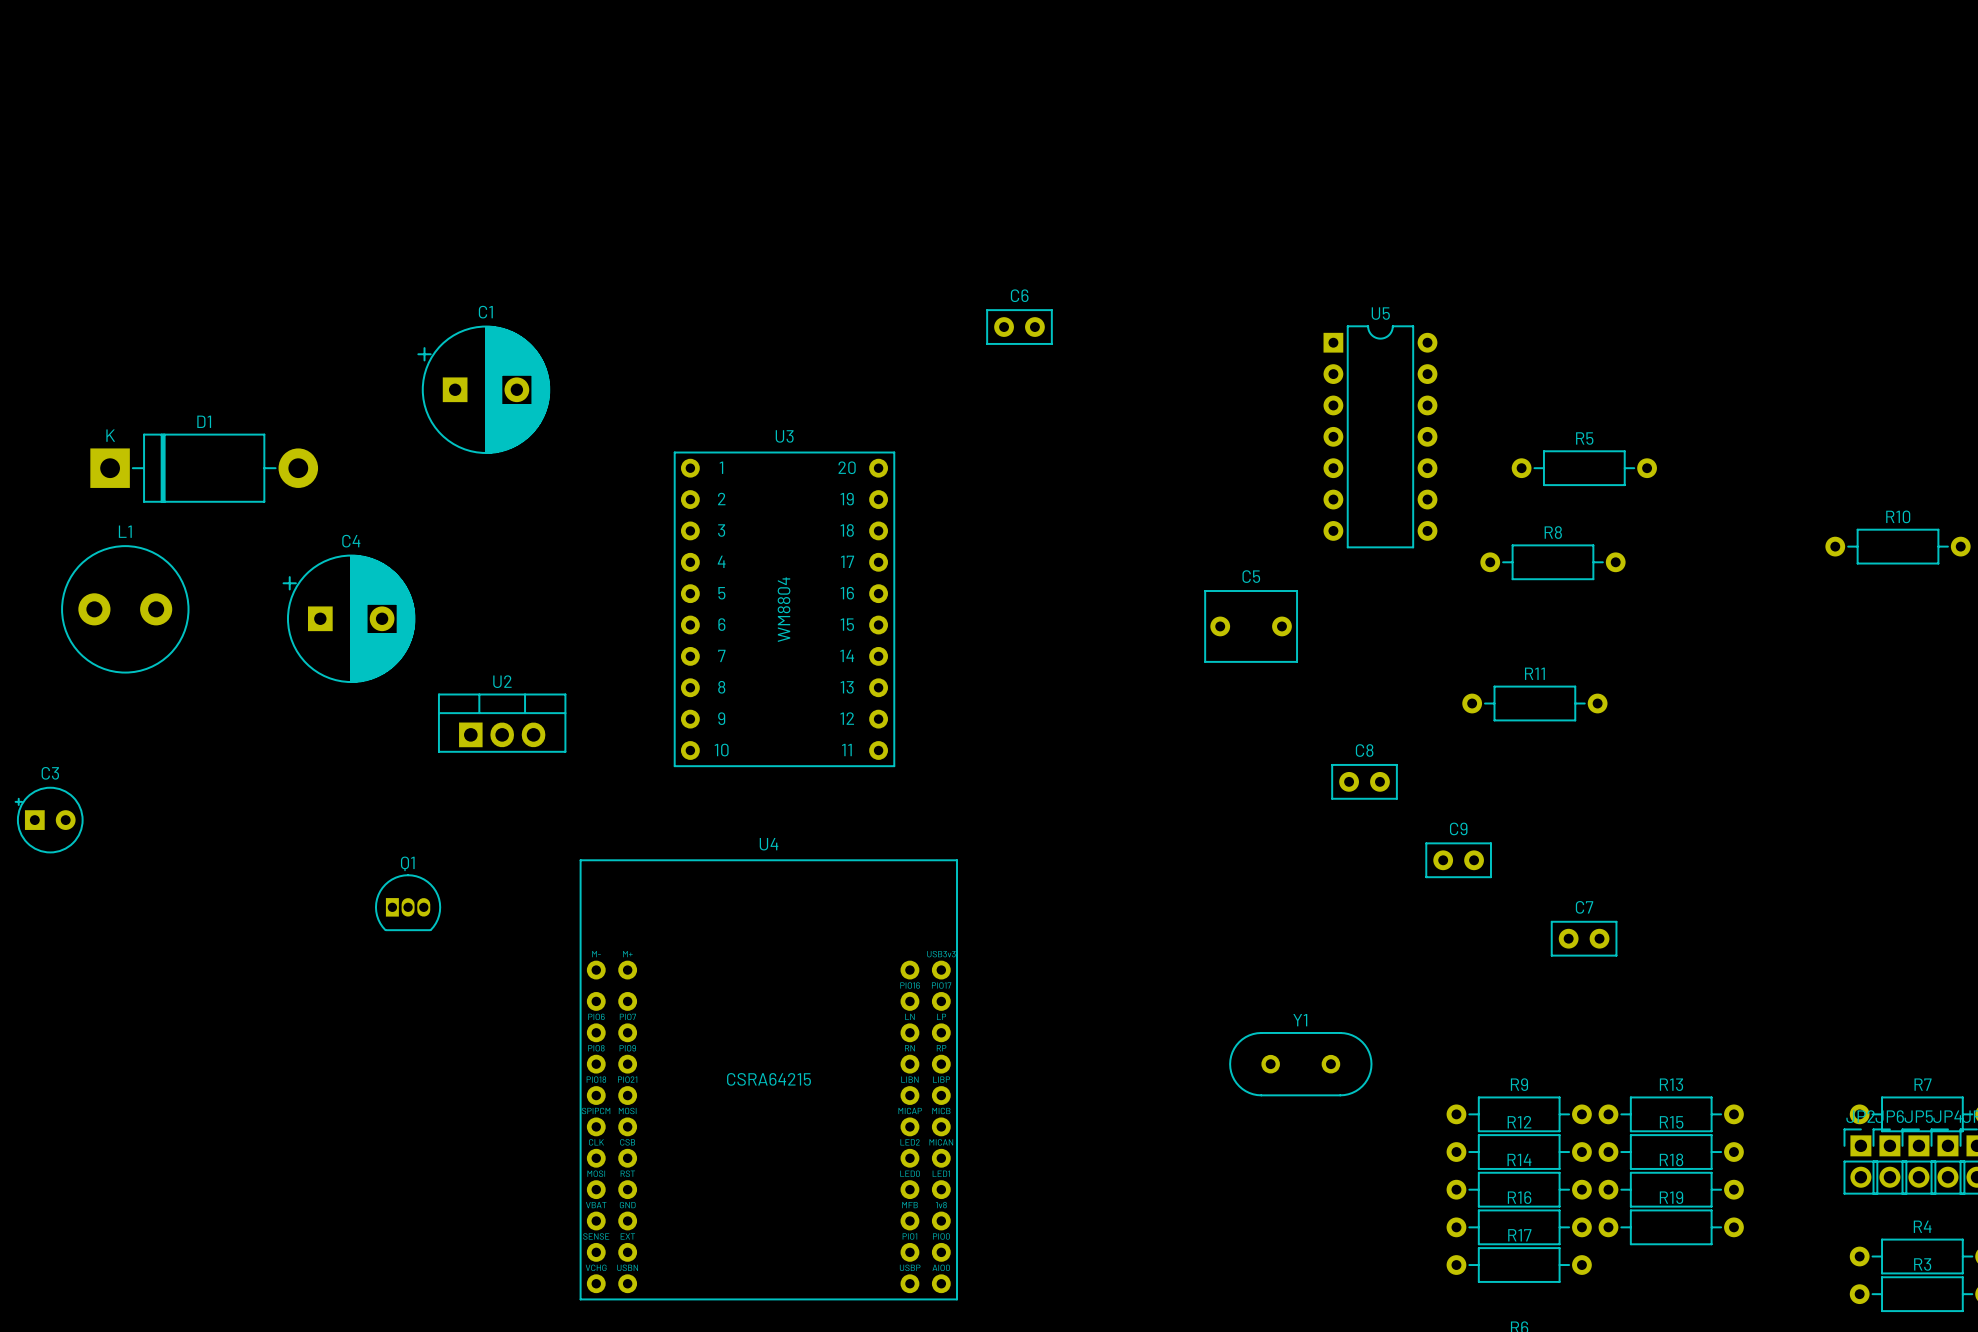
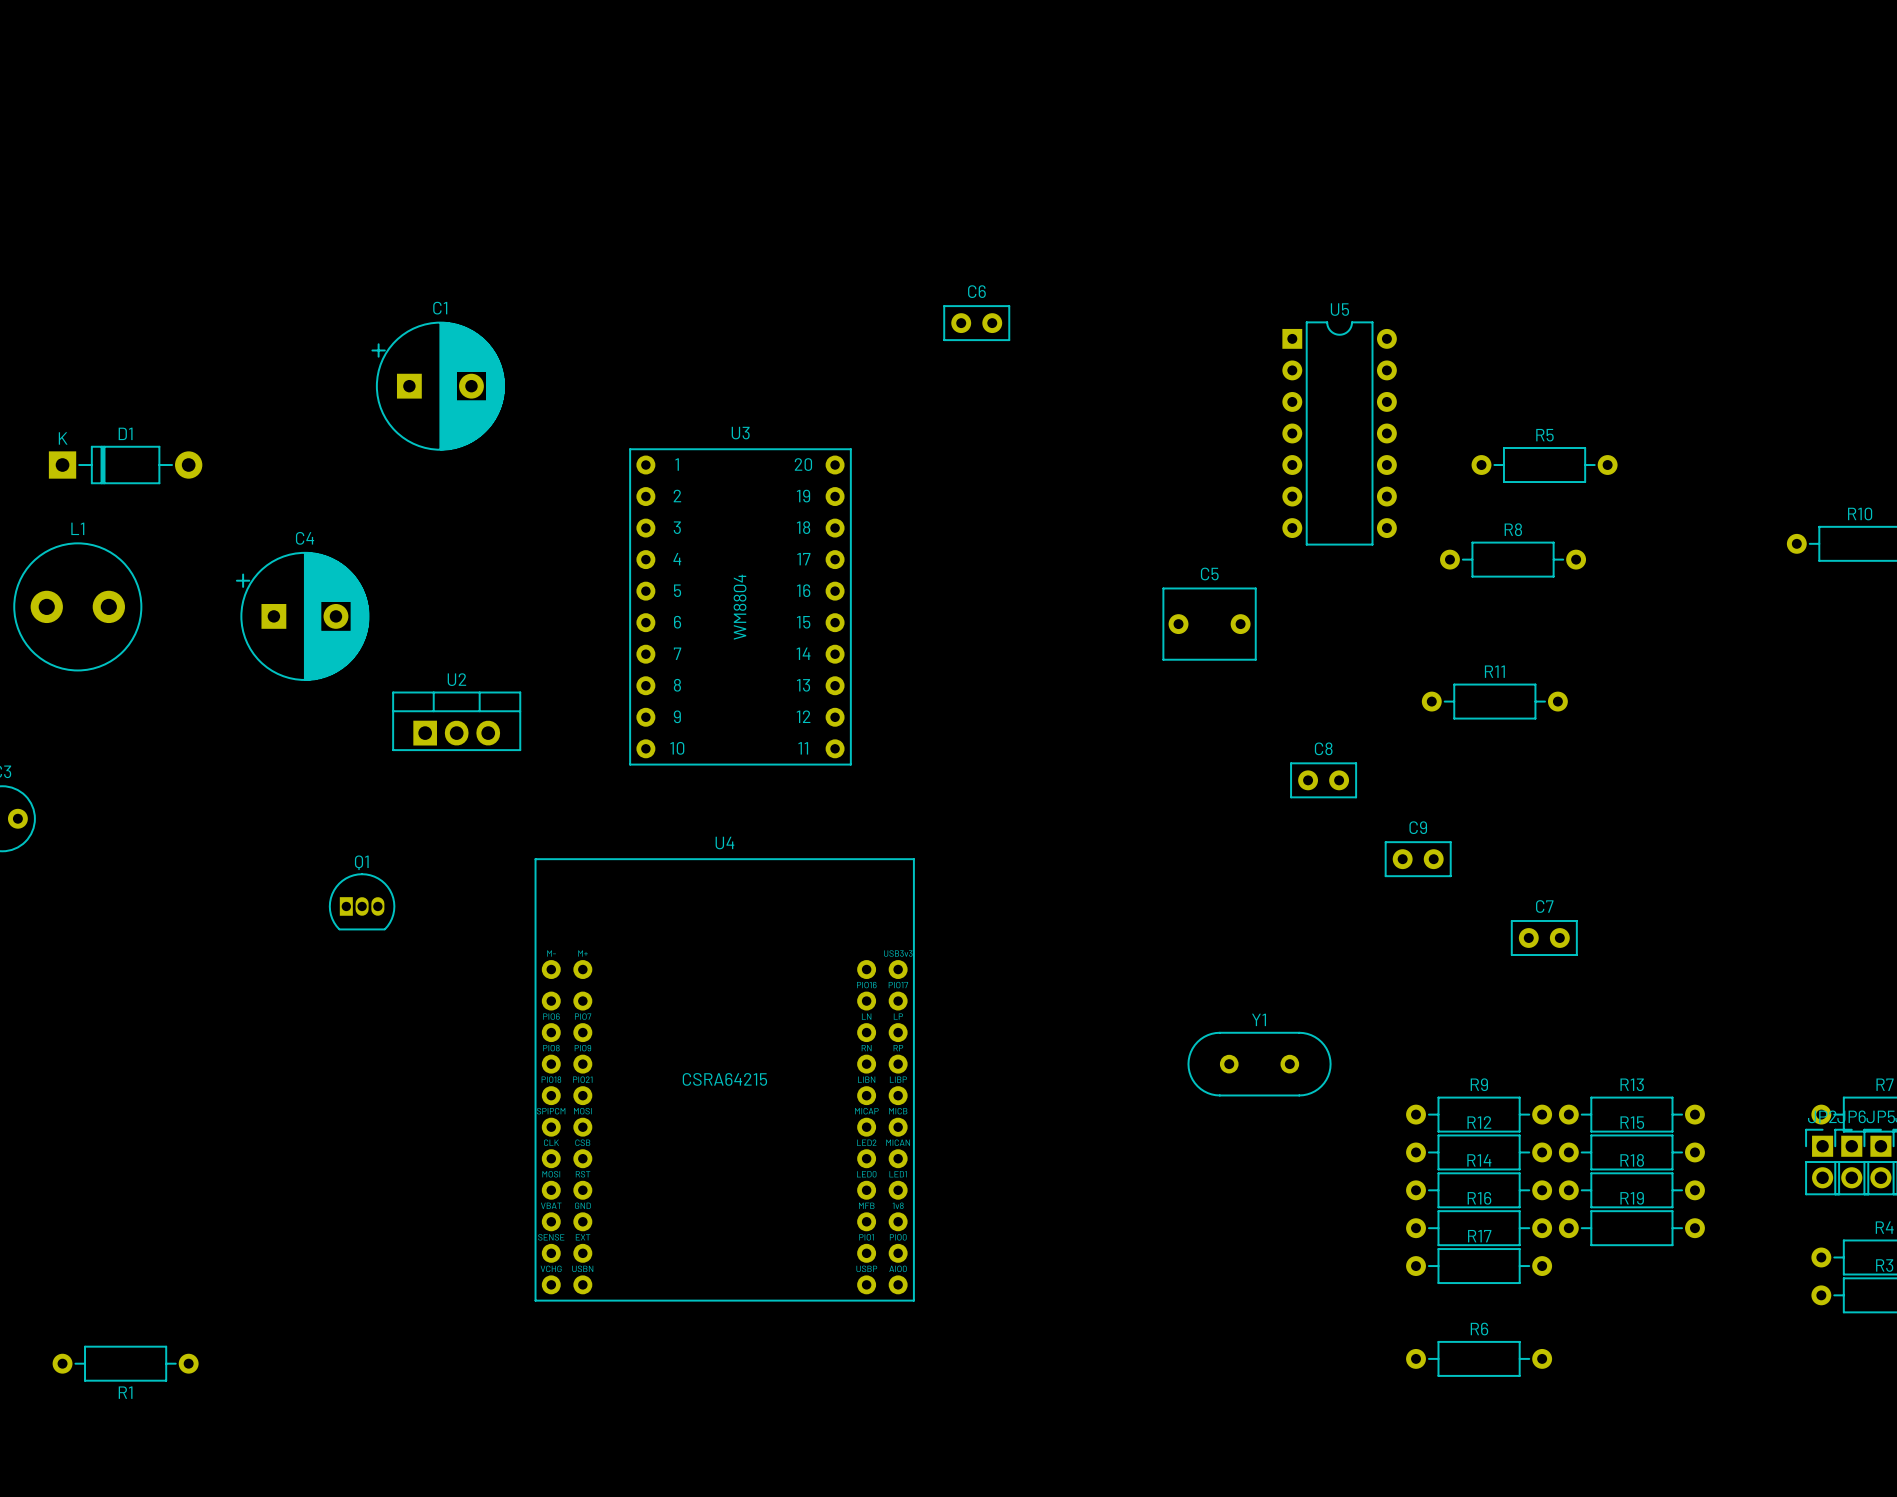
D1 footprint: [90, 433, 319, 503] -> [48, 446, 203, 485]

